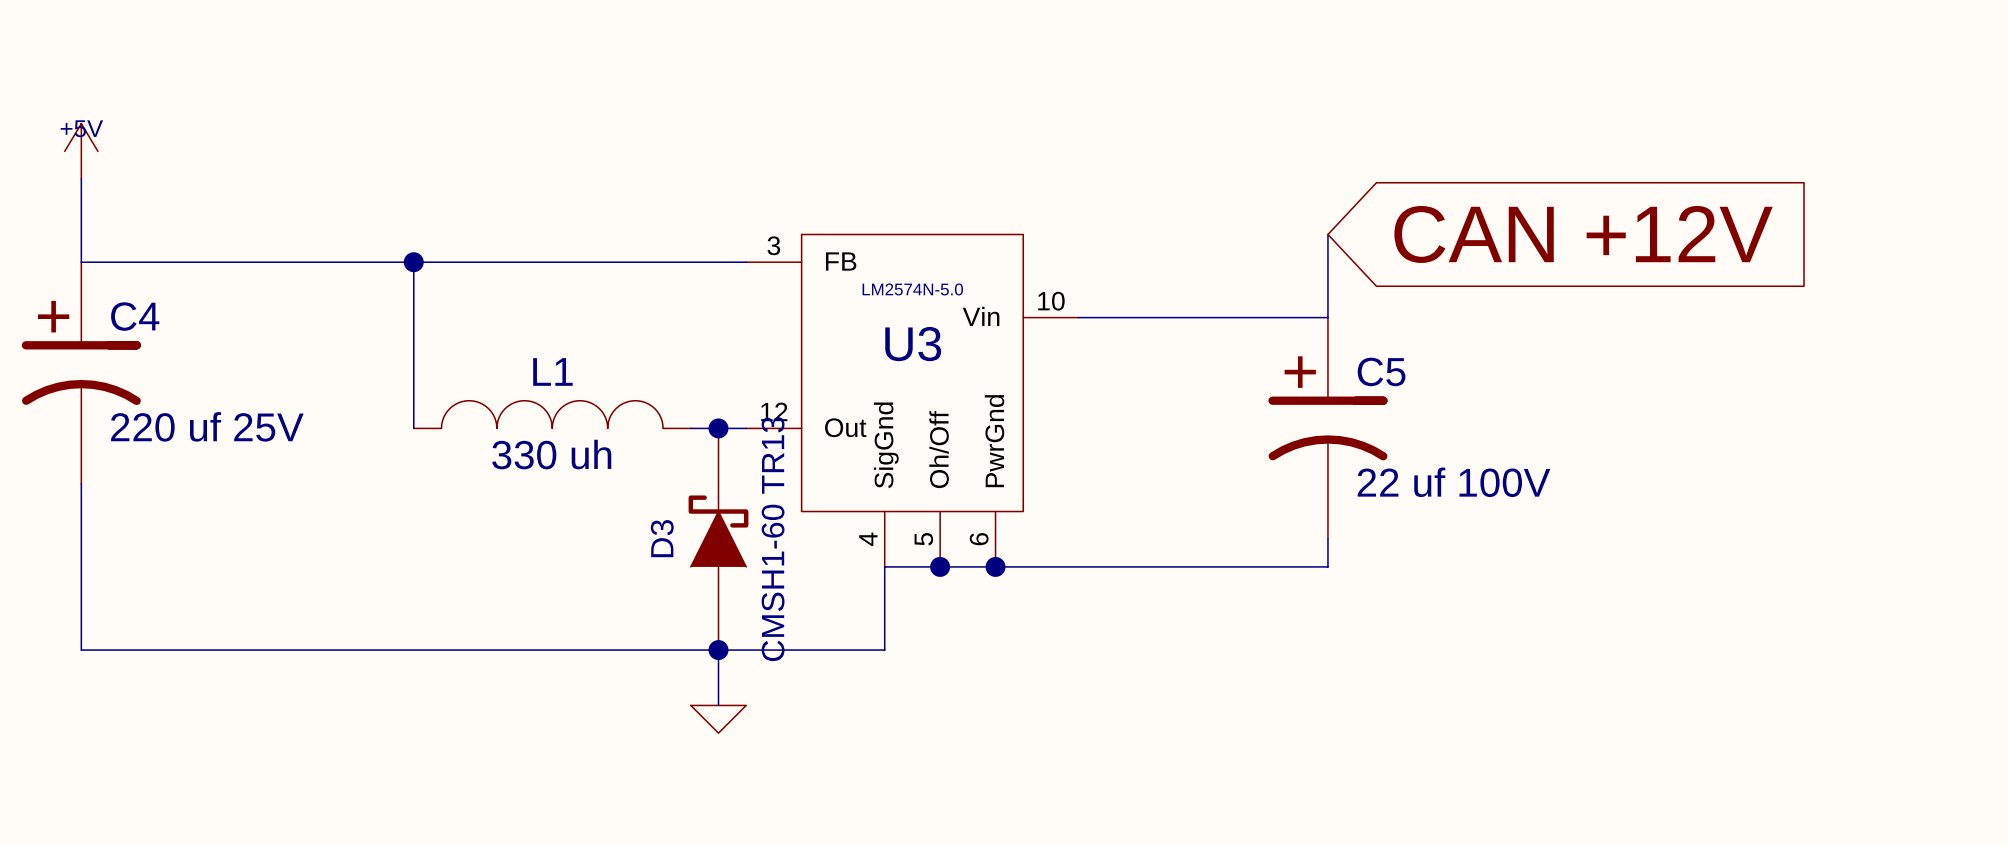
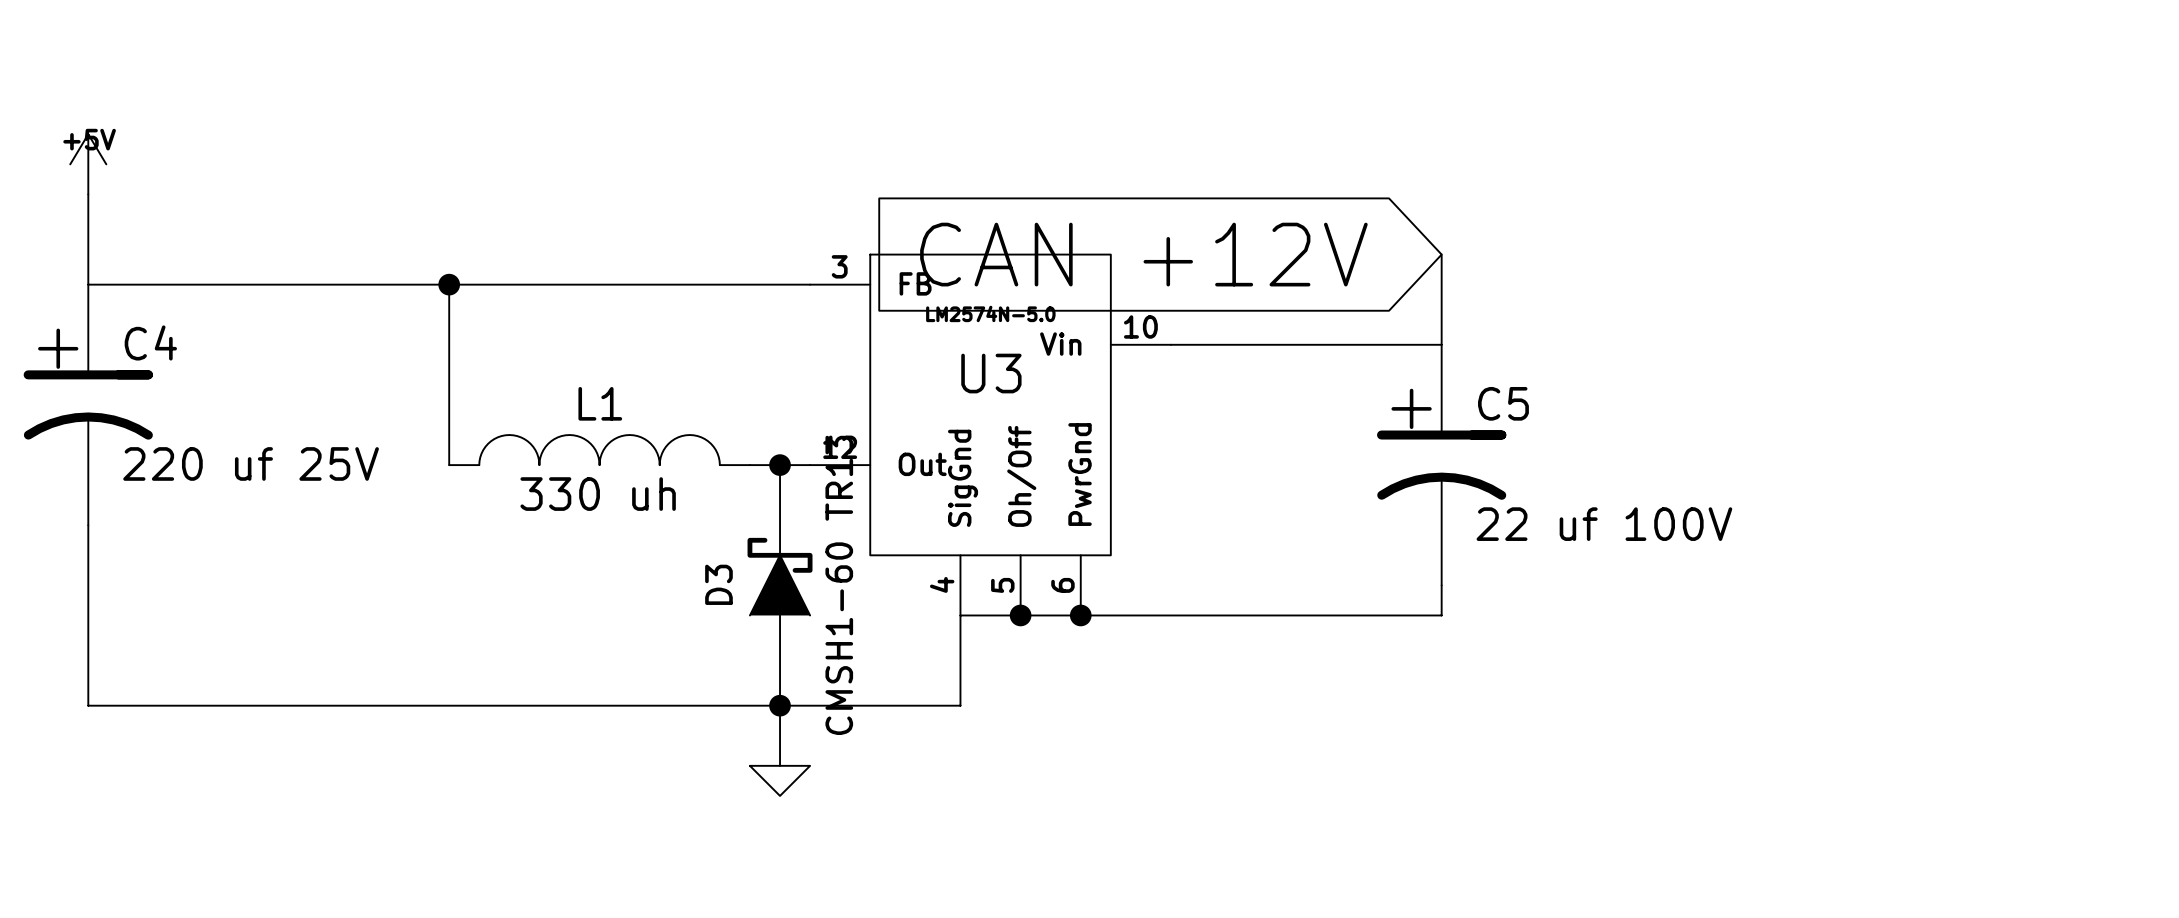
global label rotation: 0° (1583, 234) -> 180° (1143, 254)

